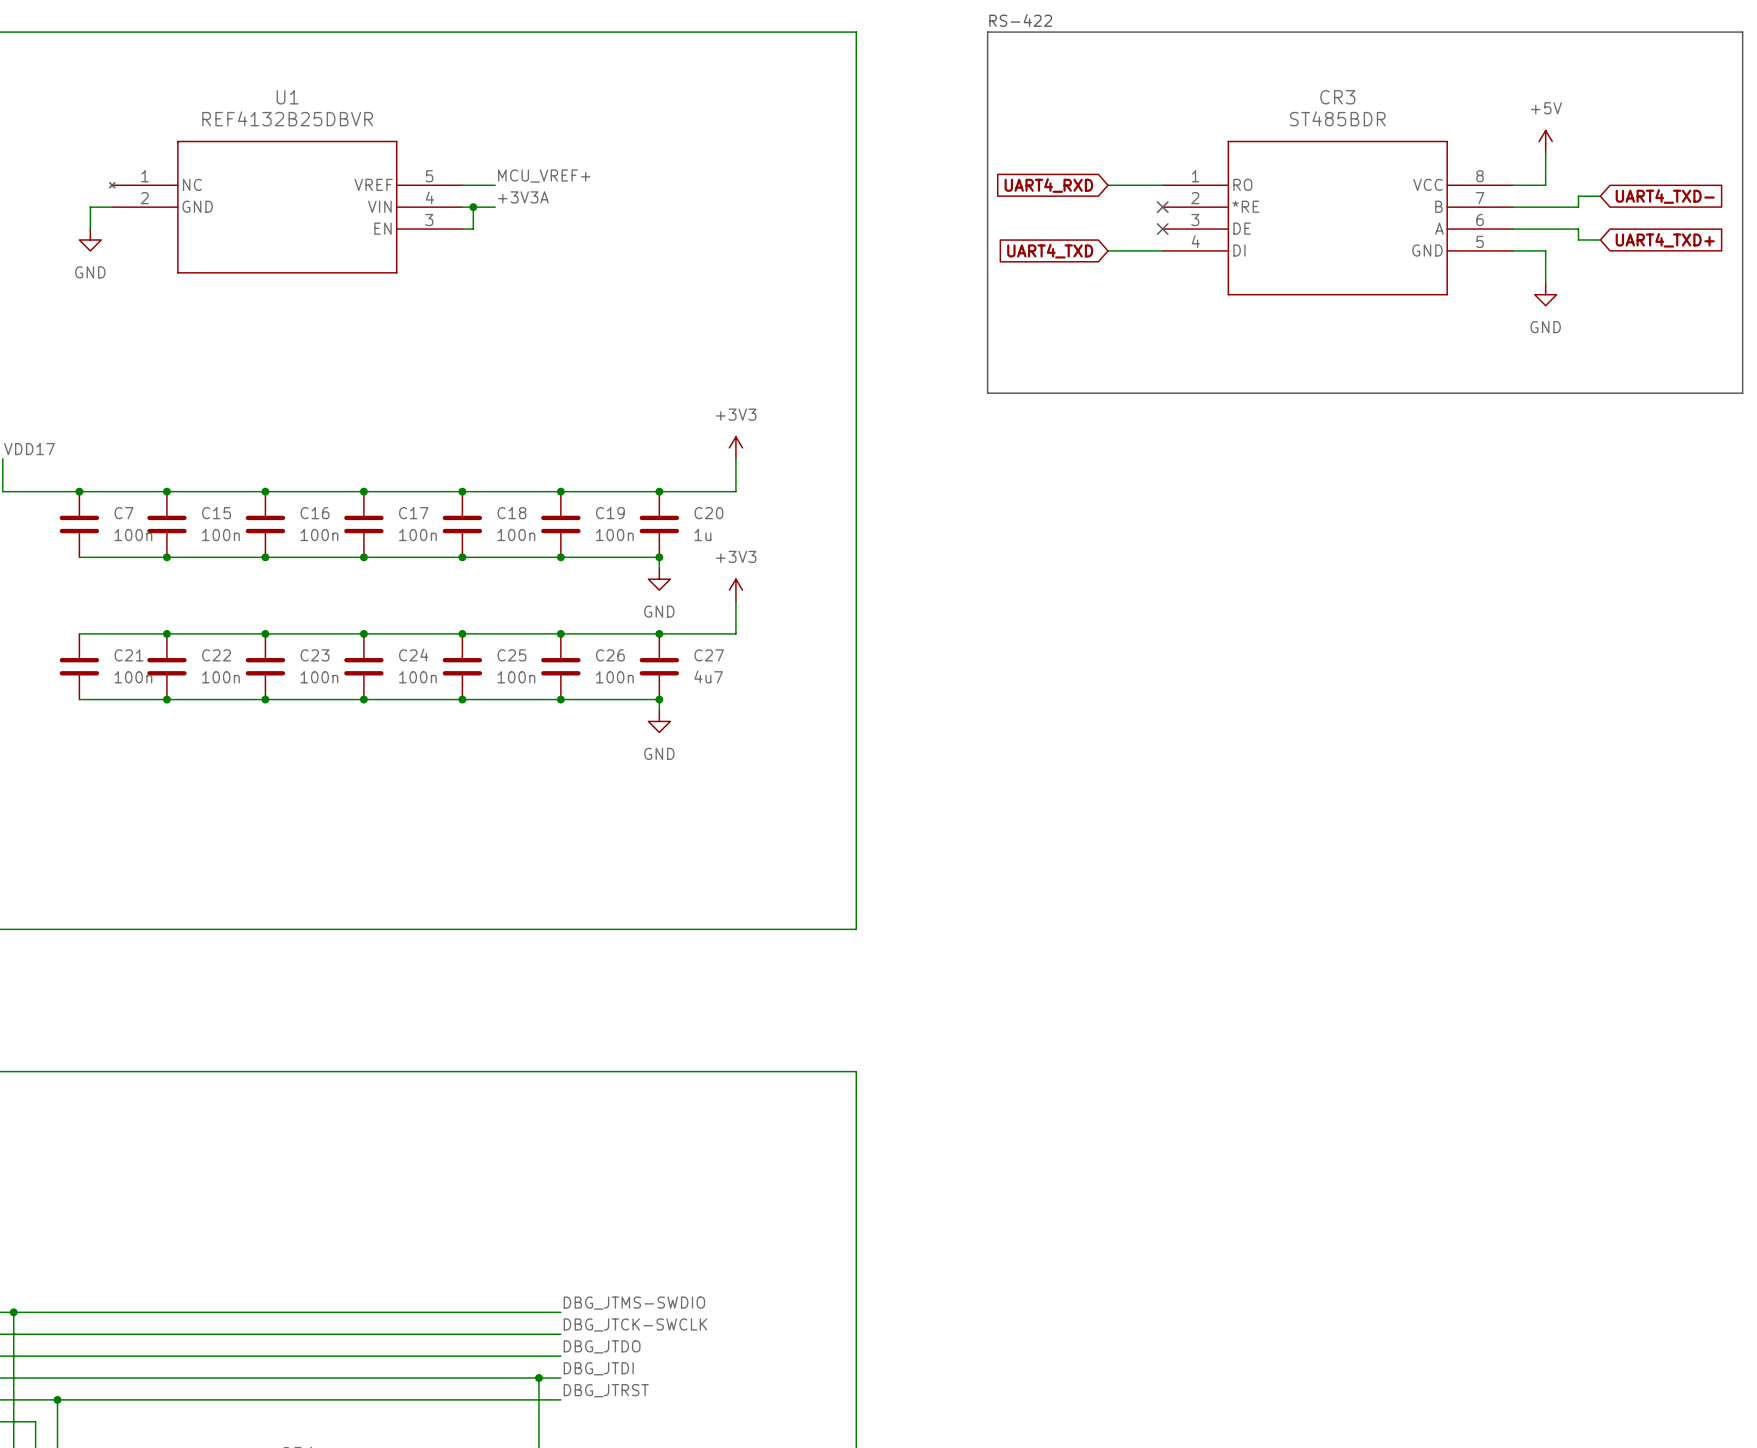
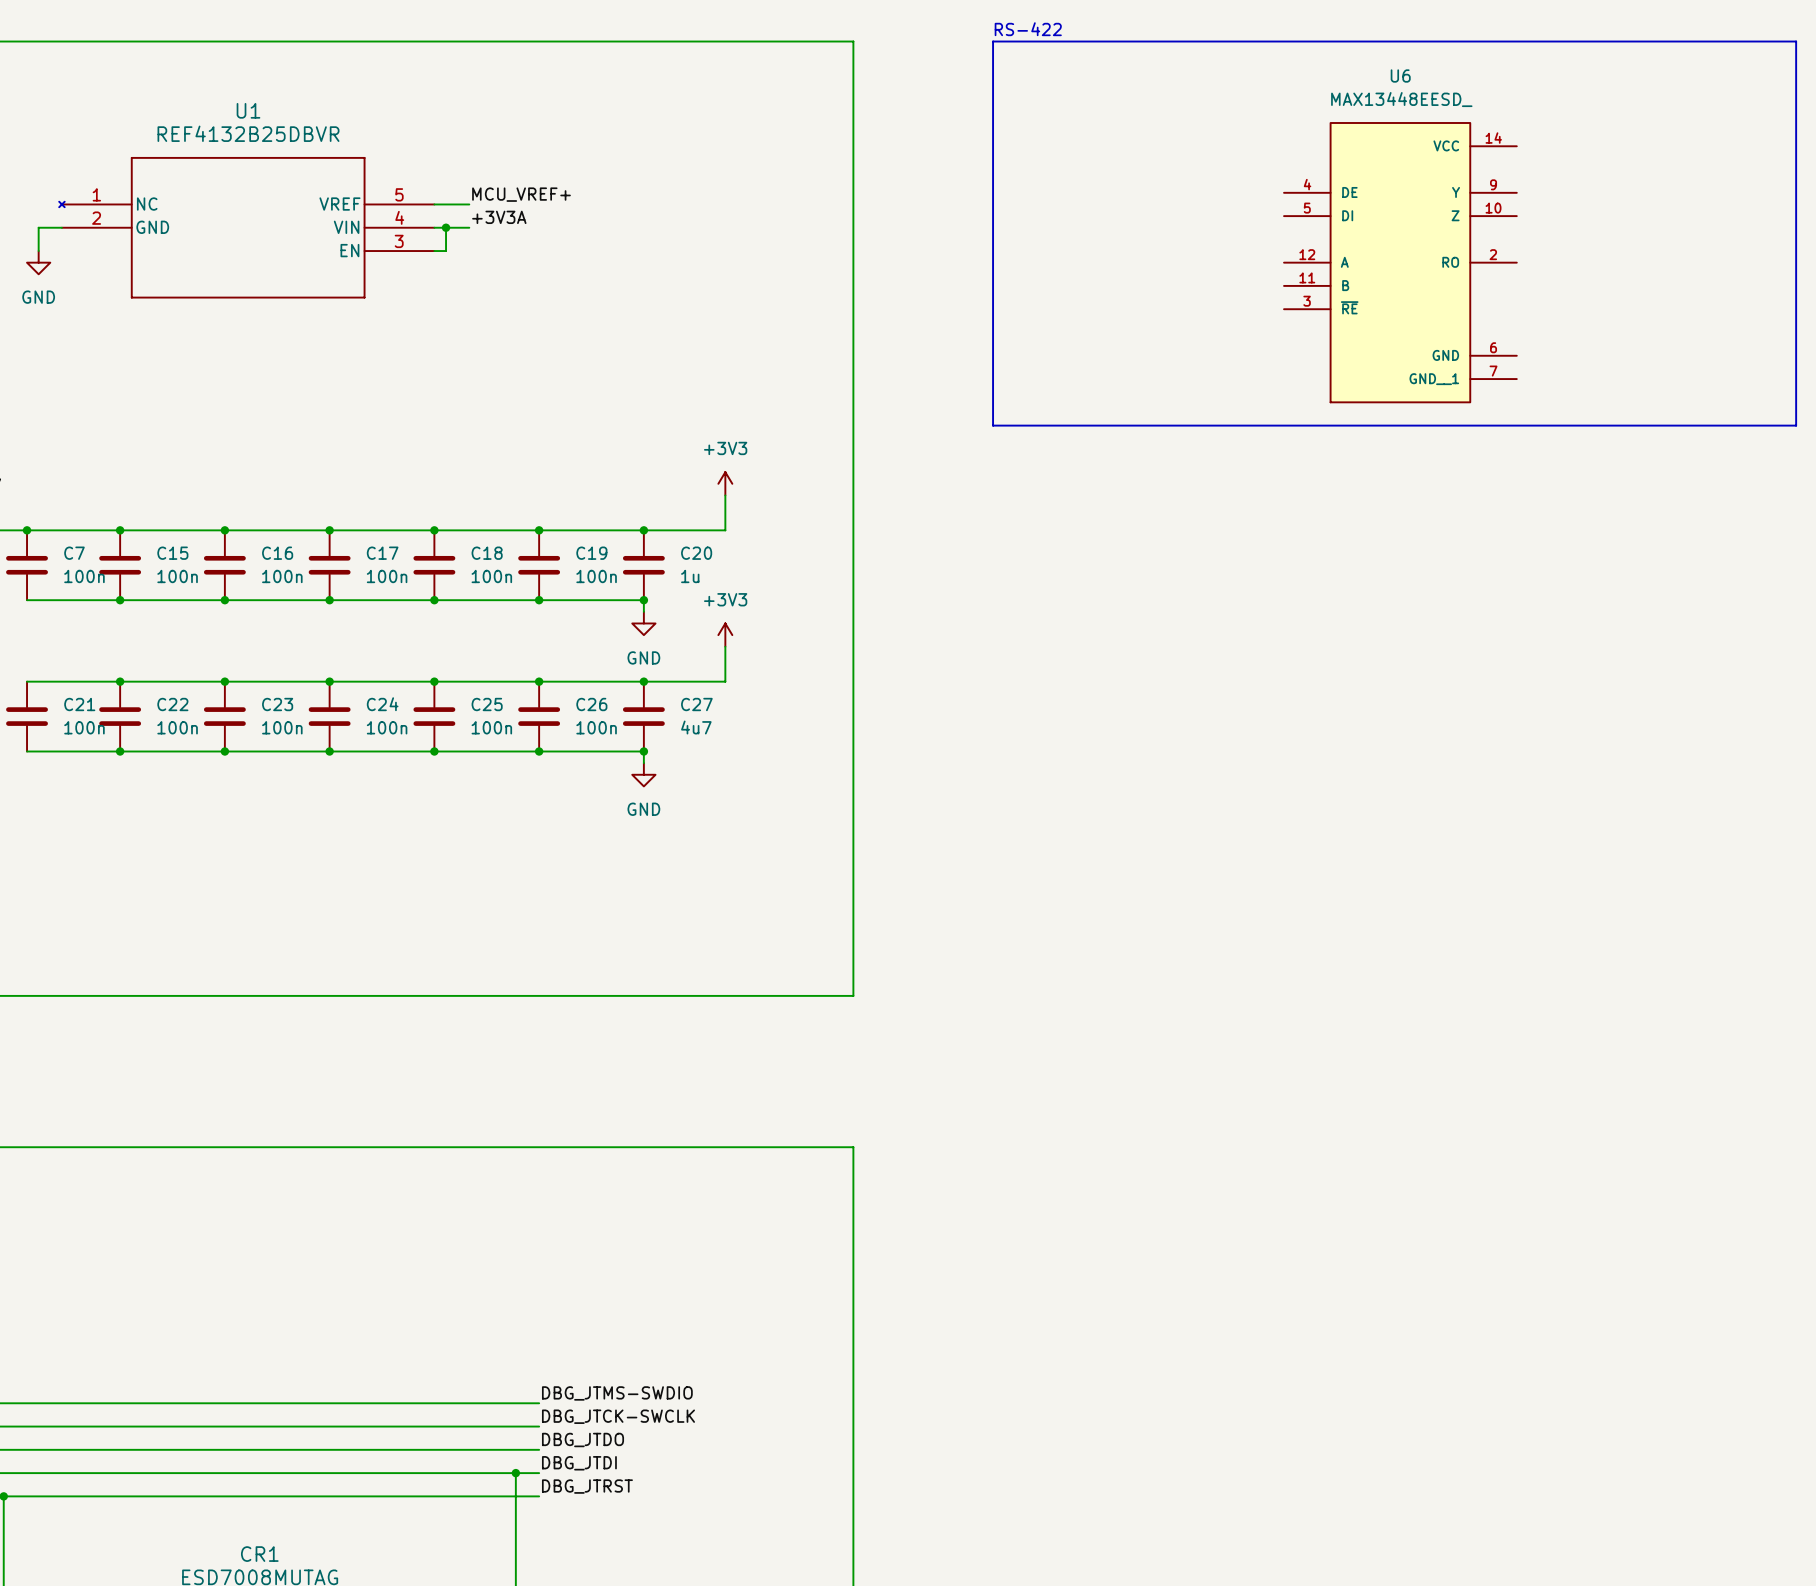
power symbol: +5V (1545, 141) -> none
wire: (1545, 152) (1545, 185) (1512, 185) -> none
global label: UART4_RXD (1048, 185) -> none
wire: (1107, 185) (1162, 185) -> none
wire: (1600, 196) (1578, 196) (1578, 207) (1512, 207) -> none
global label: UART4_TXD- (1665, 196) -> none
no-connect mark: (1162, 207) -> none
CR3: ST485BDR (1337, 218) -> none
no-connect mark: (1162, 229) -> none
wire: (1512, 229) (1578, 229) (1578, 239) (1600, 239) -> none
U6: none -> MAX13448EESD_ (1400, 262)
global label: UART4_TXD+ (1665, 240) -> none
wire: (1107, 250) (1162, 250) -> none
wire: (1512, 250) (1545, 250) (1545, 283) -> none
global label: UART4_TXD (1050, 251) -> none
power symbol: GND (1545, 294) -> none

